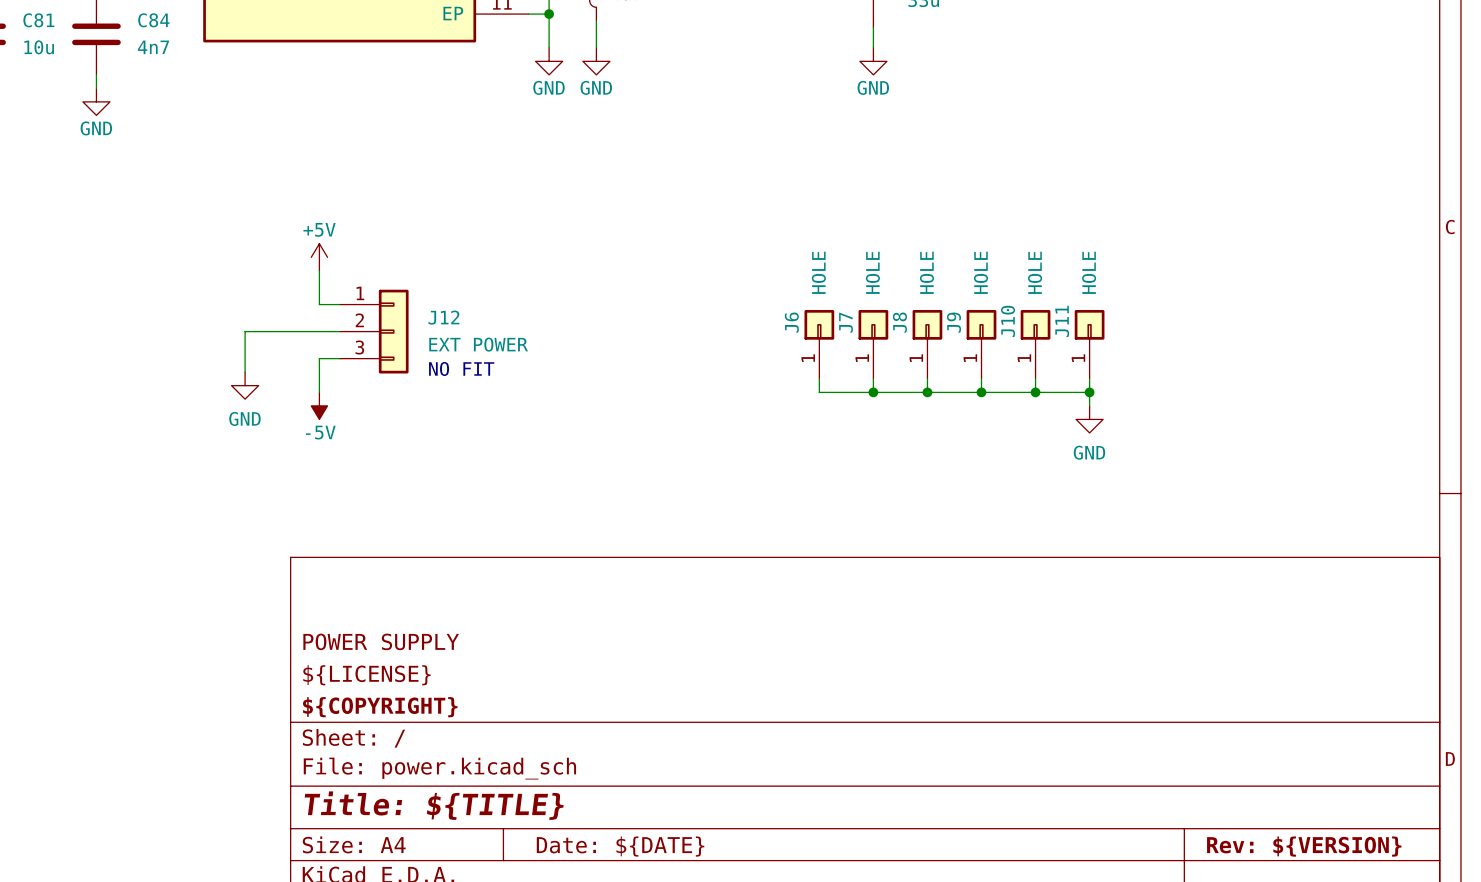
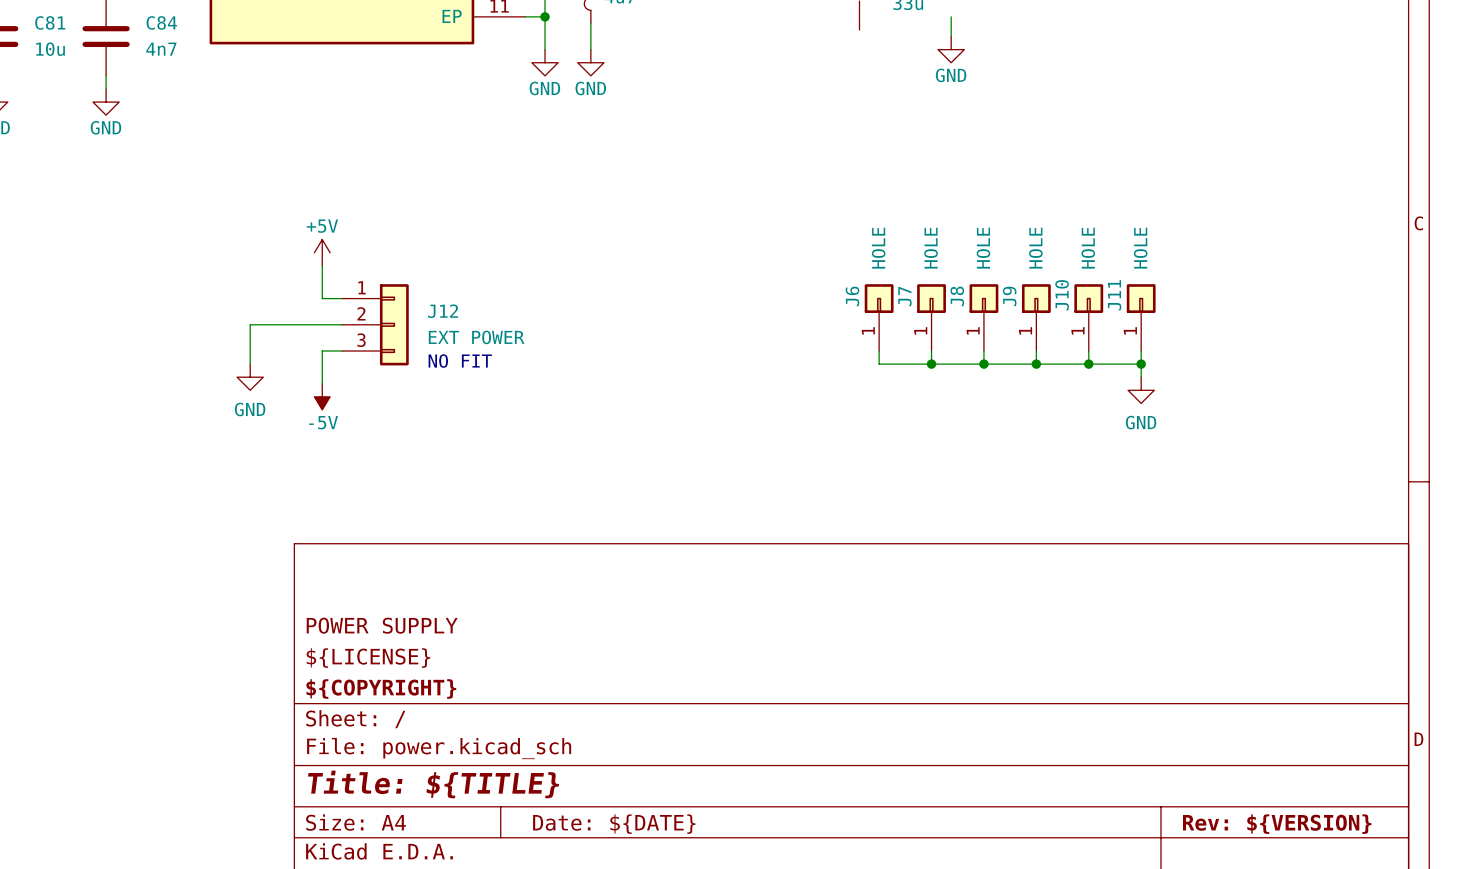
wire: (873, 27) (873, 47) -> (951, 16) (951, 36)
power symbol position: GND (873, 61) -> GND (951, 49)
J6 position: (819, 344) -> (879, 317)
J7 position: (873, 344) -> (931, 317)
J8 position: (927, 344) -> (983, 317)
J9 position: (981, 344) -> (1036, 317)
J10 position: (1035, 344) -> (1088, 317)
J11 position: (1089, 344) -> (1141, 317)
junction: none -> (931, 364)
junction: none -> (983, 364)
junction: none -> (1036, 364)
junction: none -> (1088, 364)
junction: none -> (1141, 364)
wire: (819, 378) (819, 392) (1089, 392) -> (879, 351) (879, 364) (1141, 364)
wire: (873, 378) (873, 392) -> (931, 351) (931, 364)
wire: (927, 378) (927, 392) -> (983, 351) (983, 364)
wire: (981, 378) (981, 392) -> (1036, 351) (1036, 364)
wire: (1035, 378) (1035, 392) -> (1088, 351) (1088, 364)
wire: (1089, 378) (1089, 405) -> (1141, 351) (1141, 377)
junction: (873, 392) -> none
junction: (927, 392) -> none
junction: (981, 392) -> none
junction: (1035, 392) -> none
junction: (1089, 392) -> none
power symbol position: GND (1089, 419) -> GND (1141, 390)

